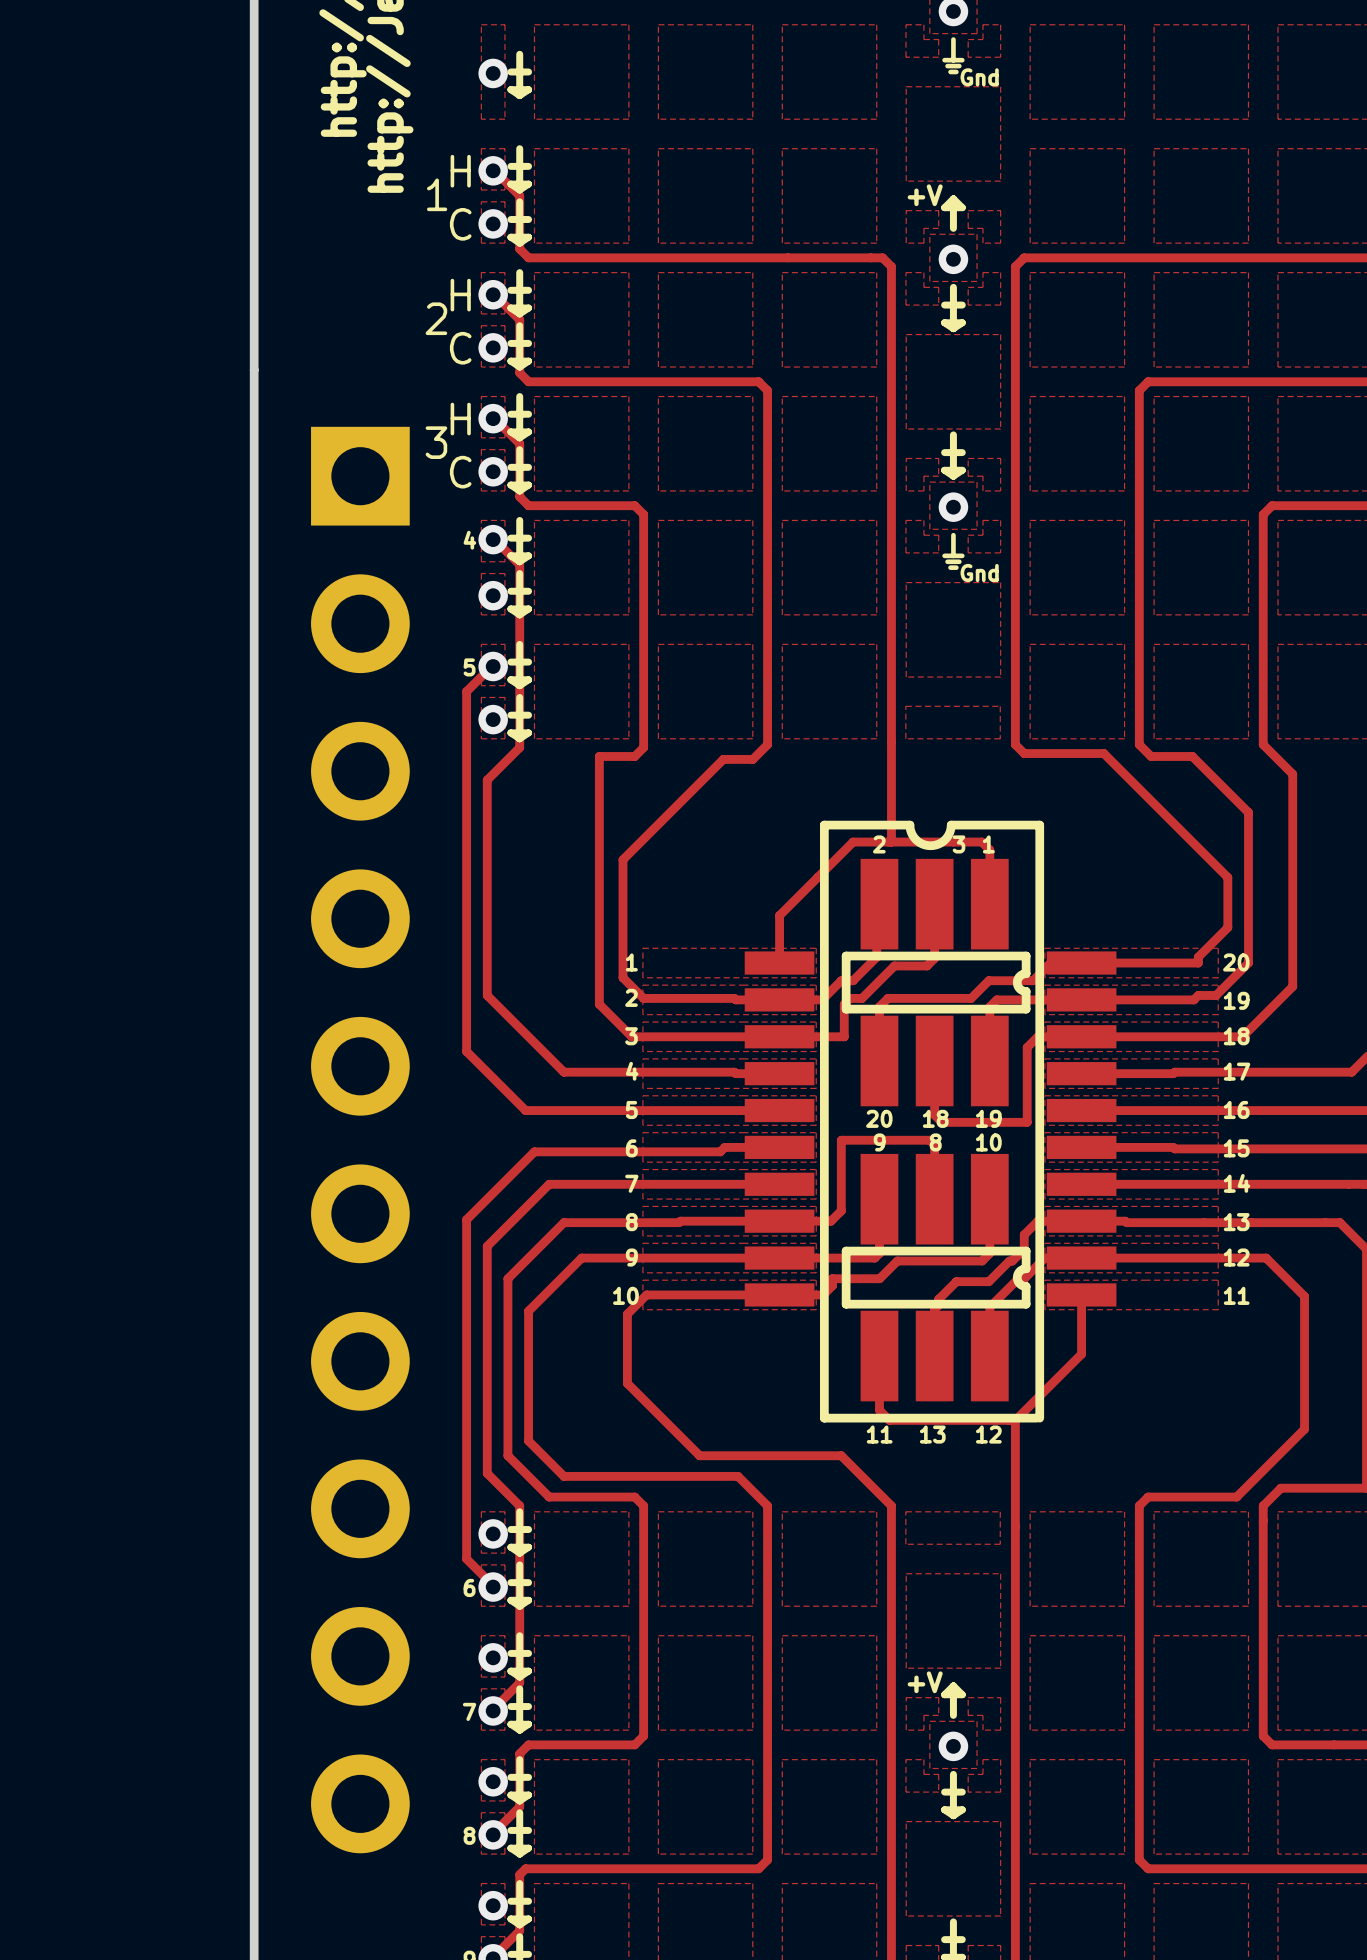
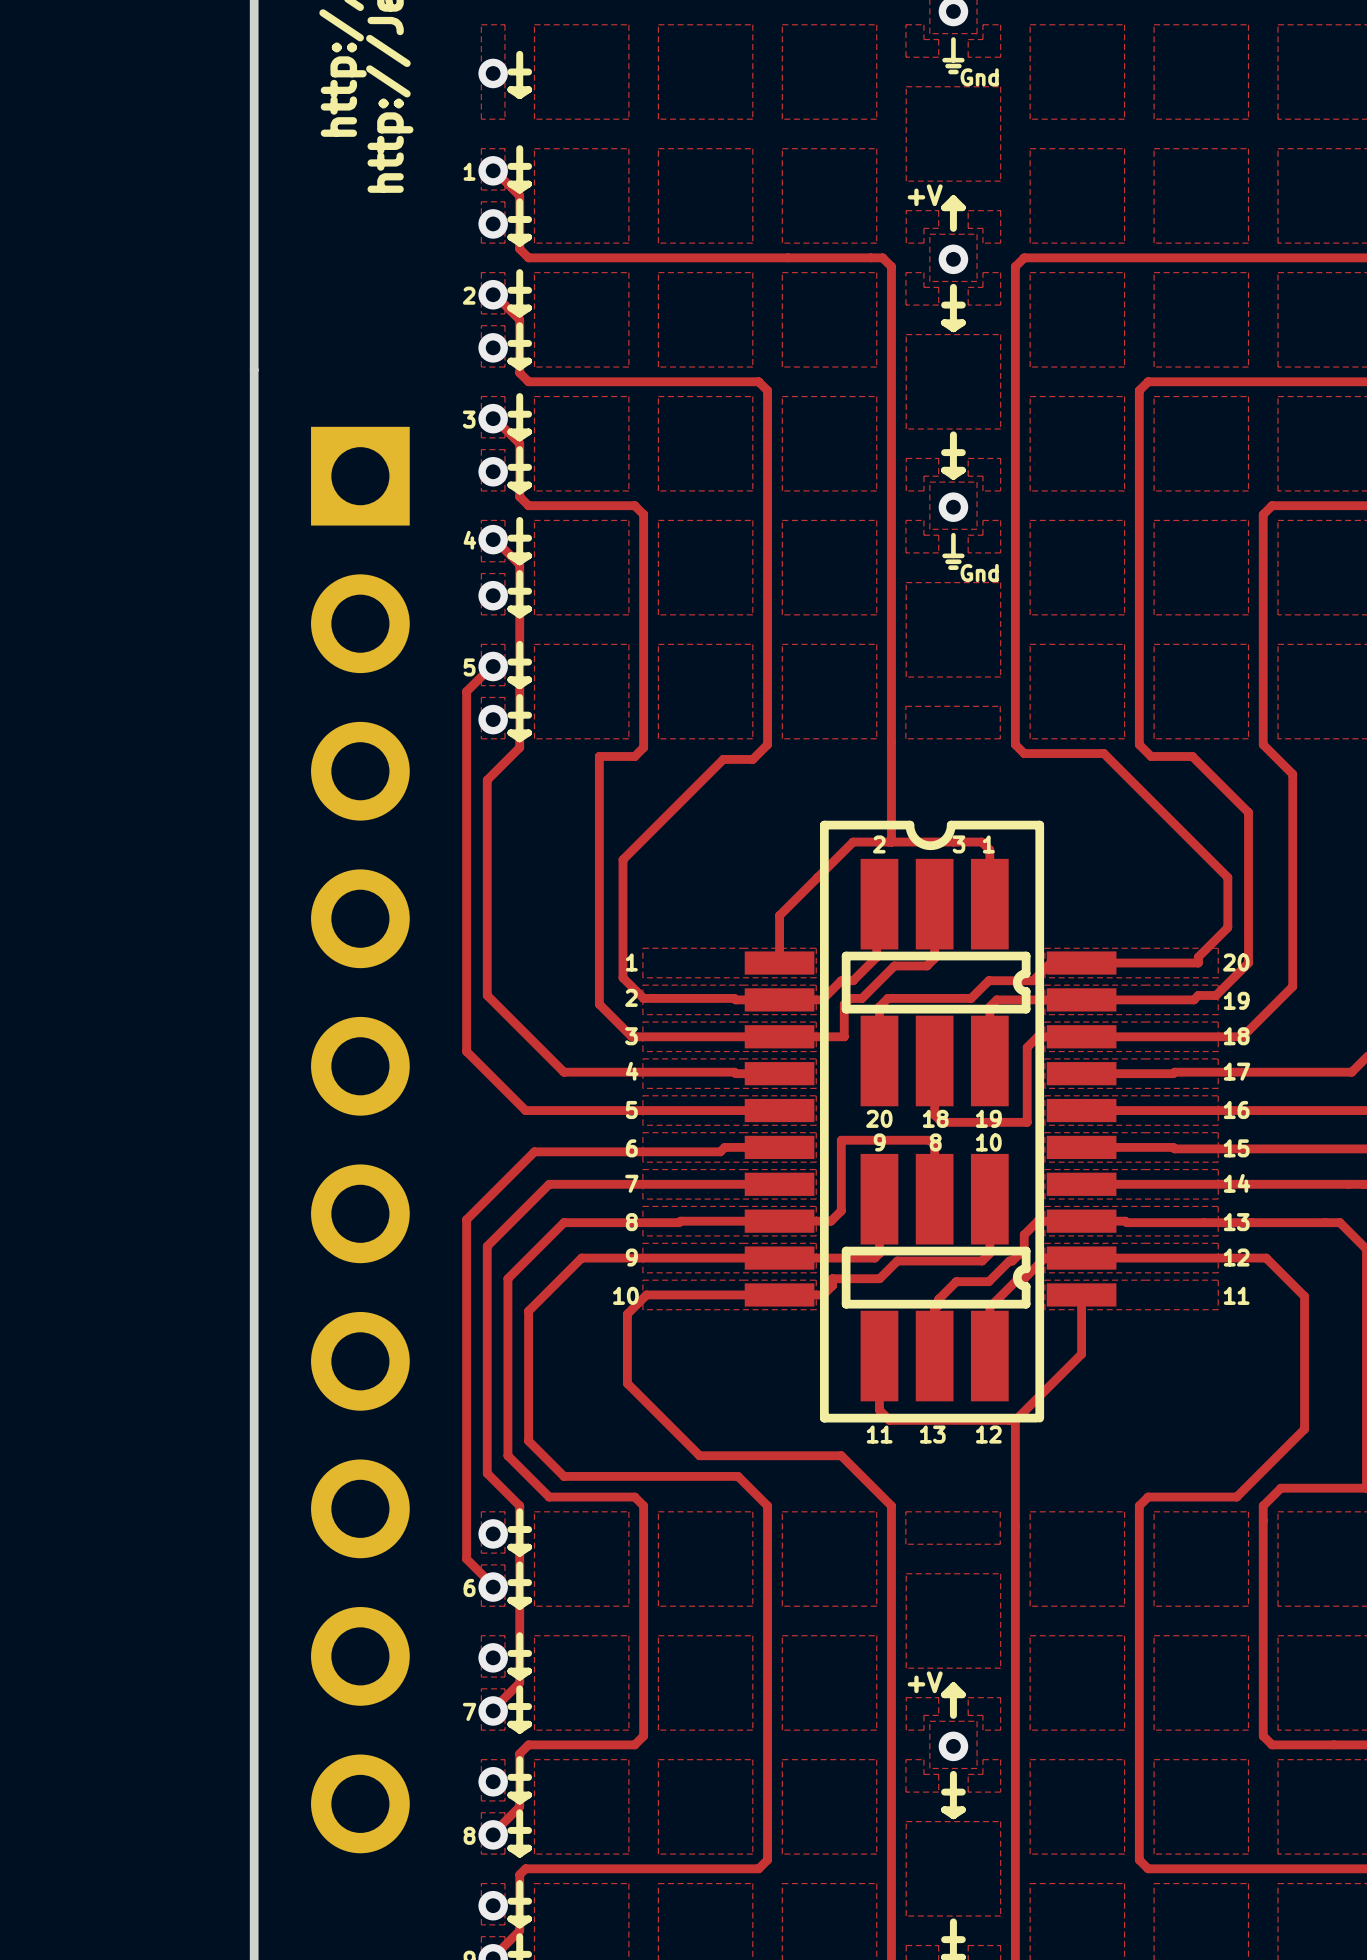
text: H (460, 171) -> none
text position: 1 (437, 194) -> 1 (469, 171)
text: C (460, 224) -> none
text: H (460, 295) -> none
text position: 2 (436, 318) -> 2 (469, 295)
text: C (460, 348) -> none
text: H (460, 419) -> none
text position: 3 (436, 442) -> 3 (469, 419)
text: C (460, 472) -> none

